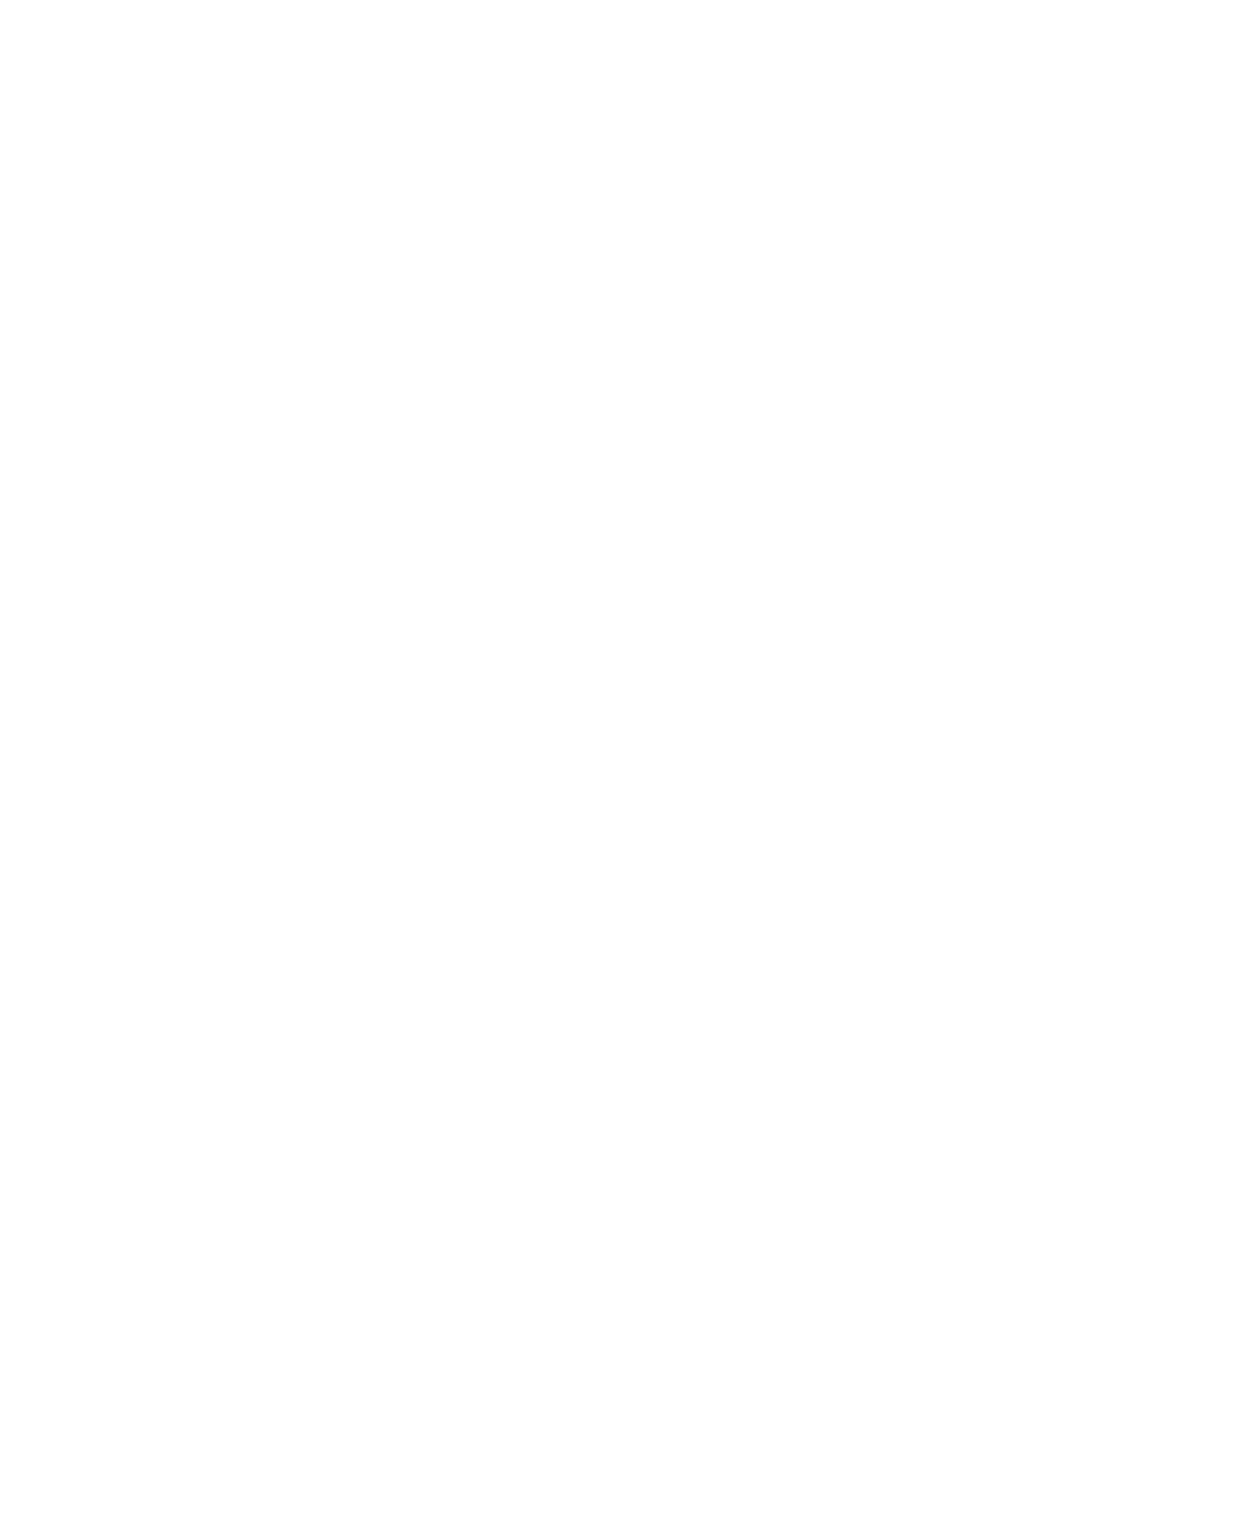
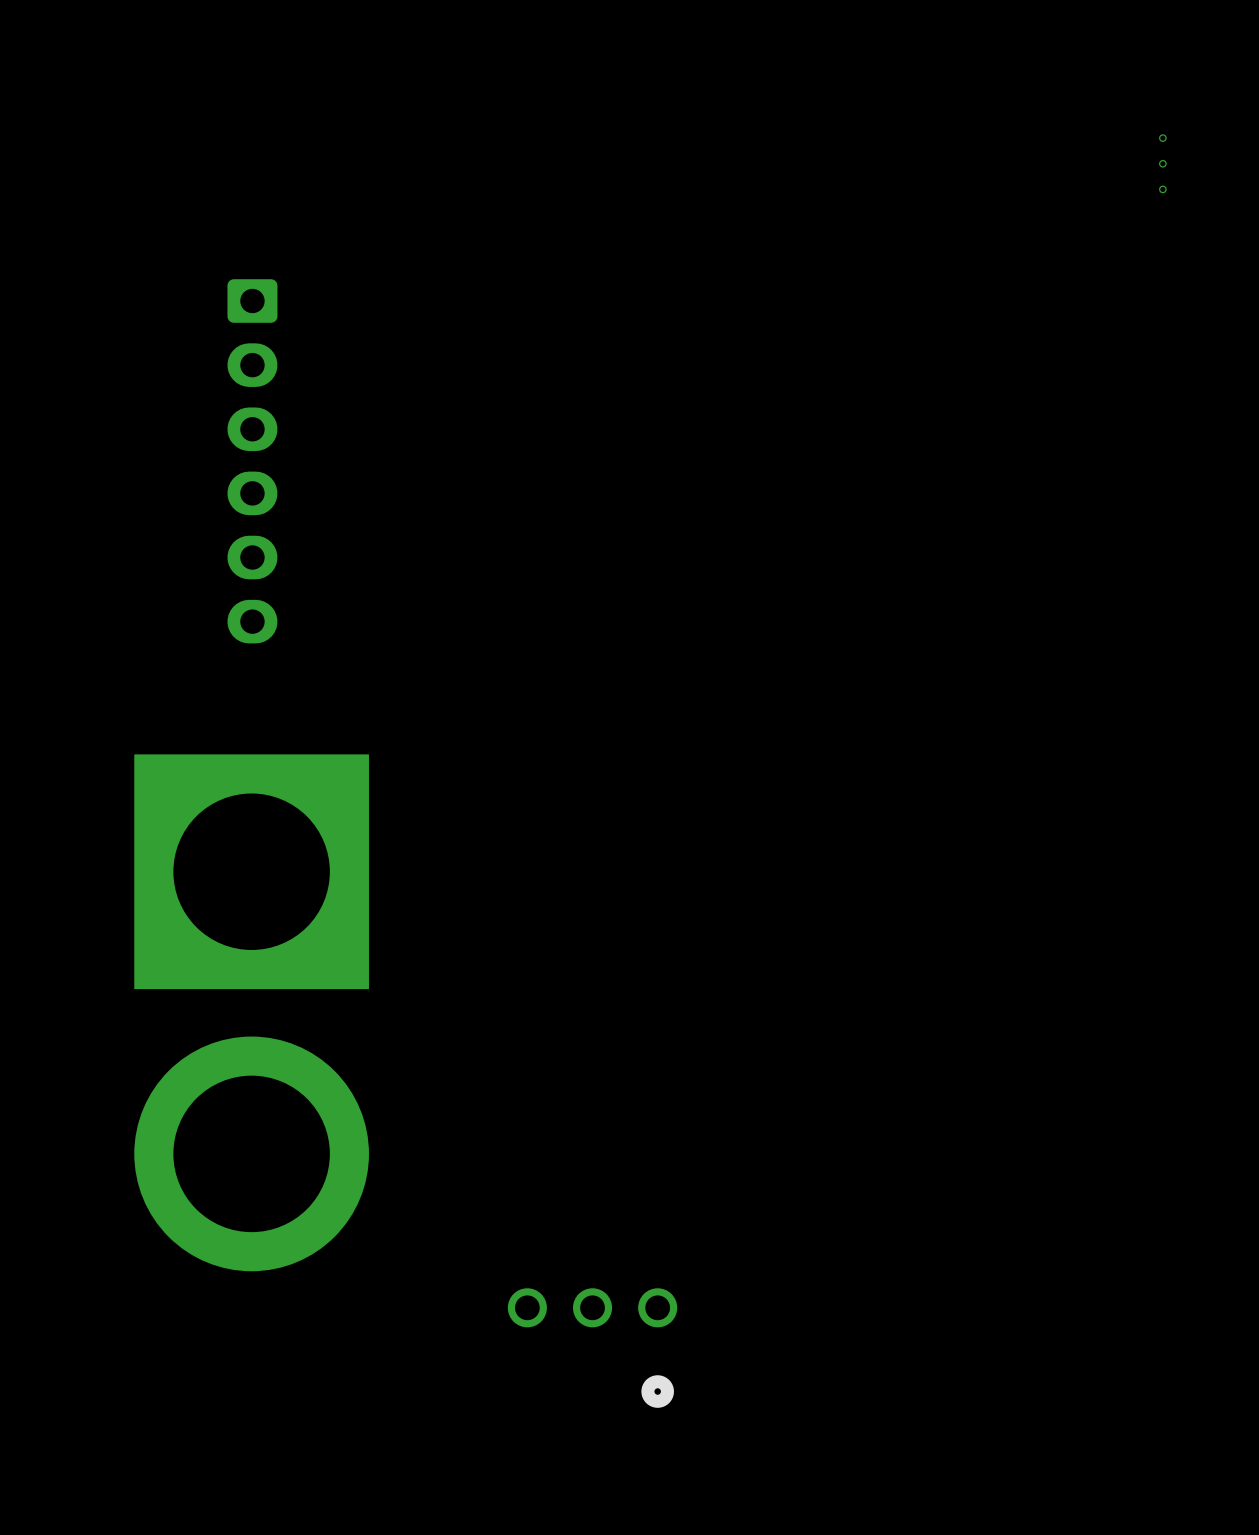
part: none -> (1162, 163)
part: none -> (252, 461)
part: none -> (251, 1012)
part: none -> (592, 1348)

